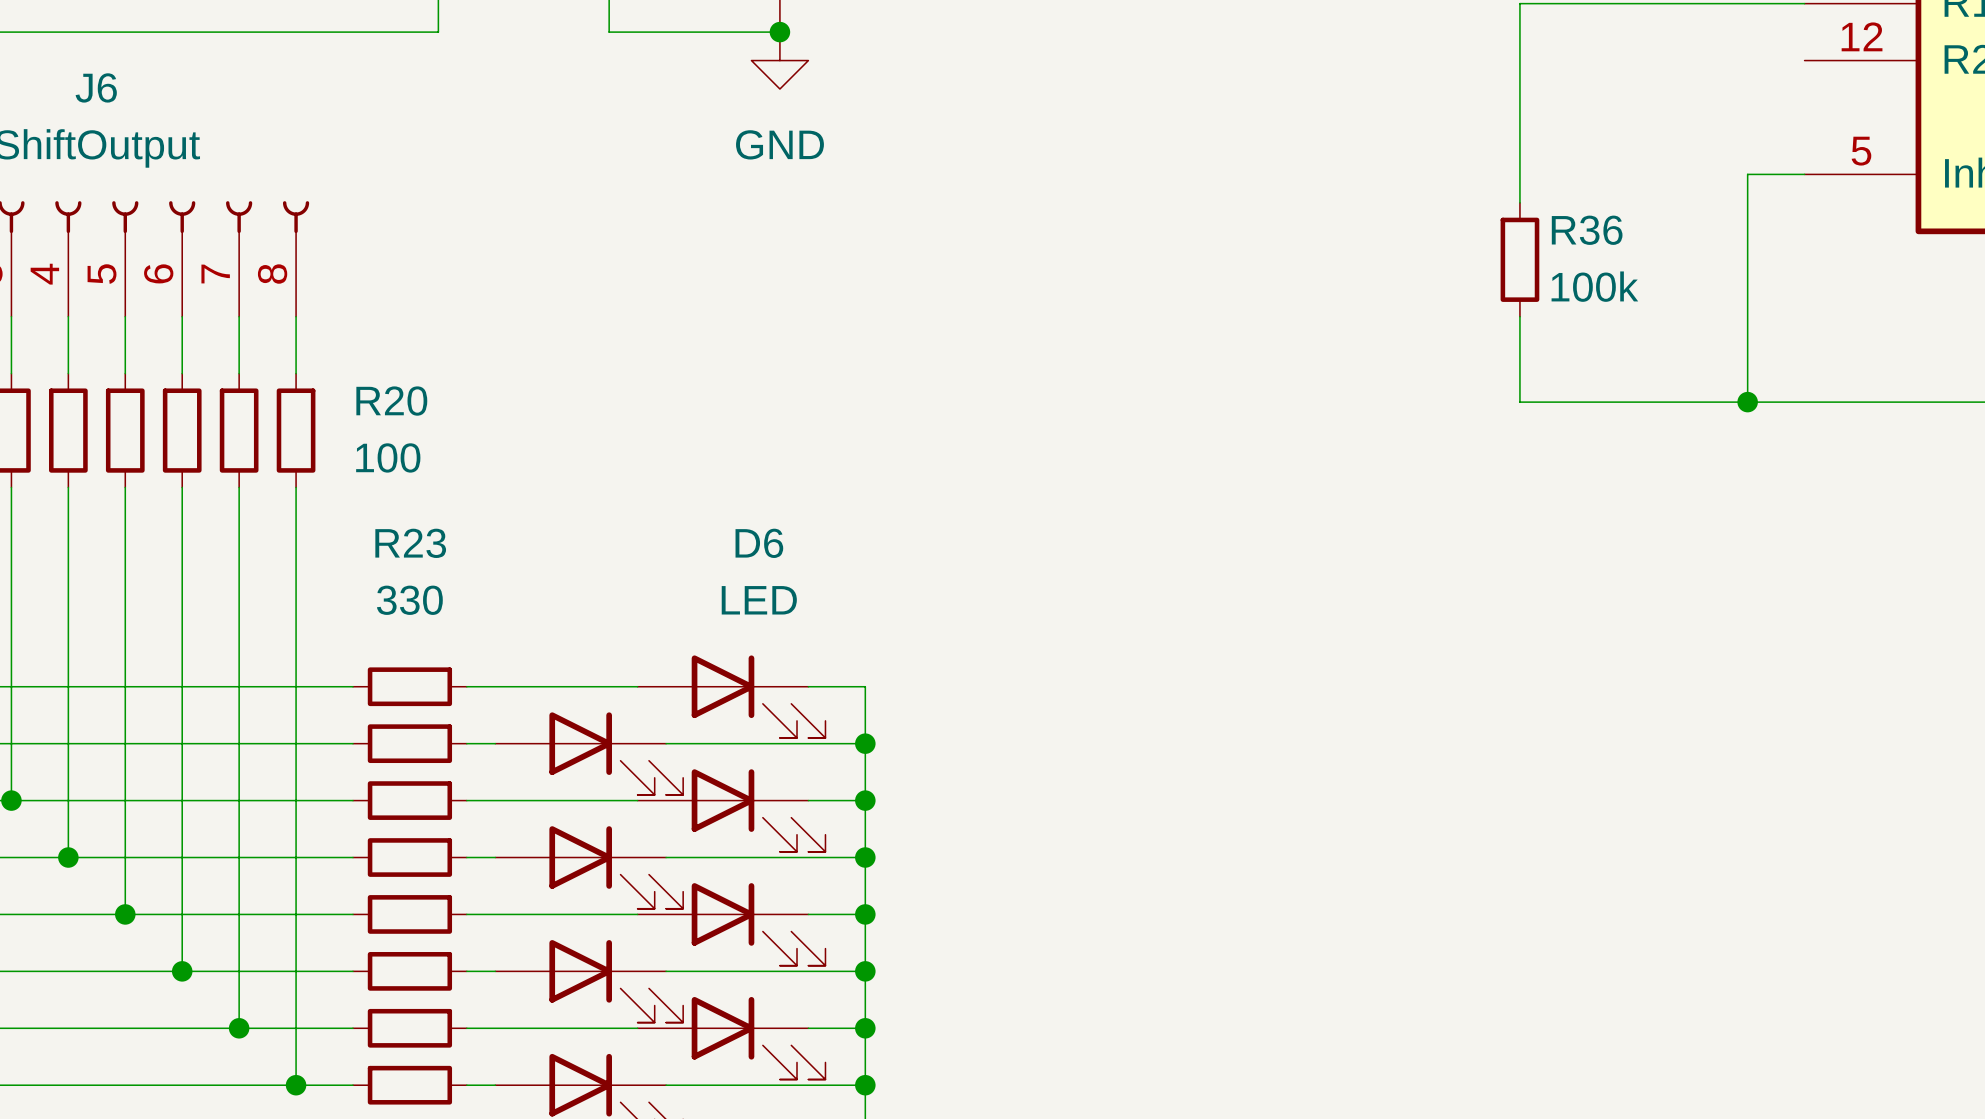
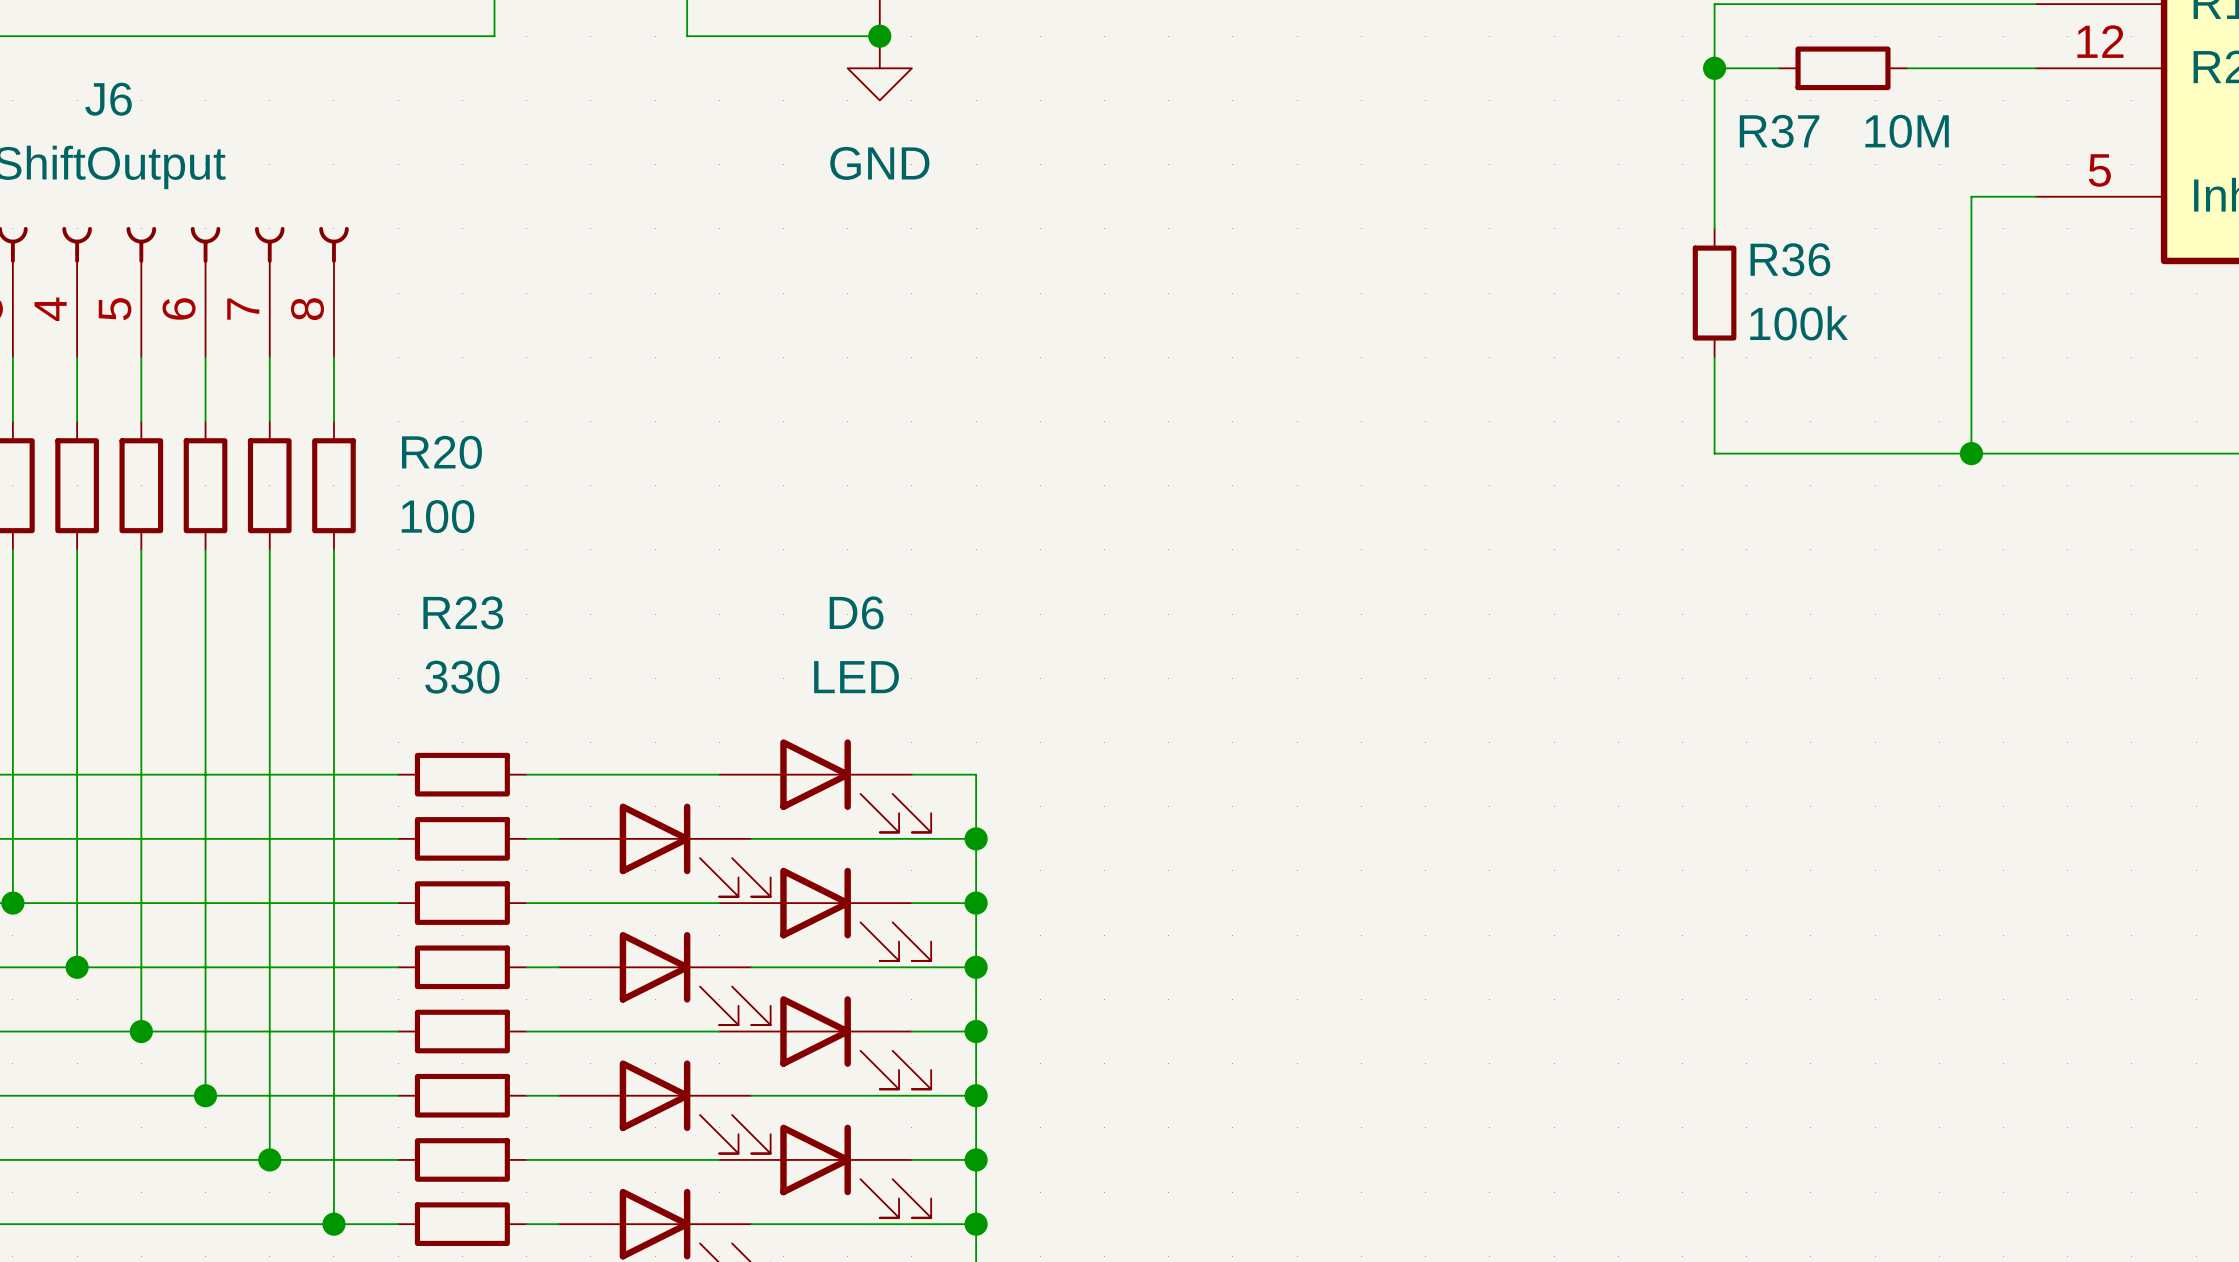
wire: none -> (1714, 68) (1778, 68)
junction: none -> (1714, 68)
R37: none -> 10M (1843, 68)
wire: none -> (1907, 68) (2035, 68)

